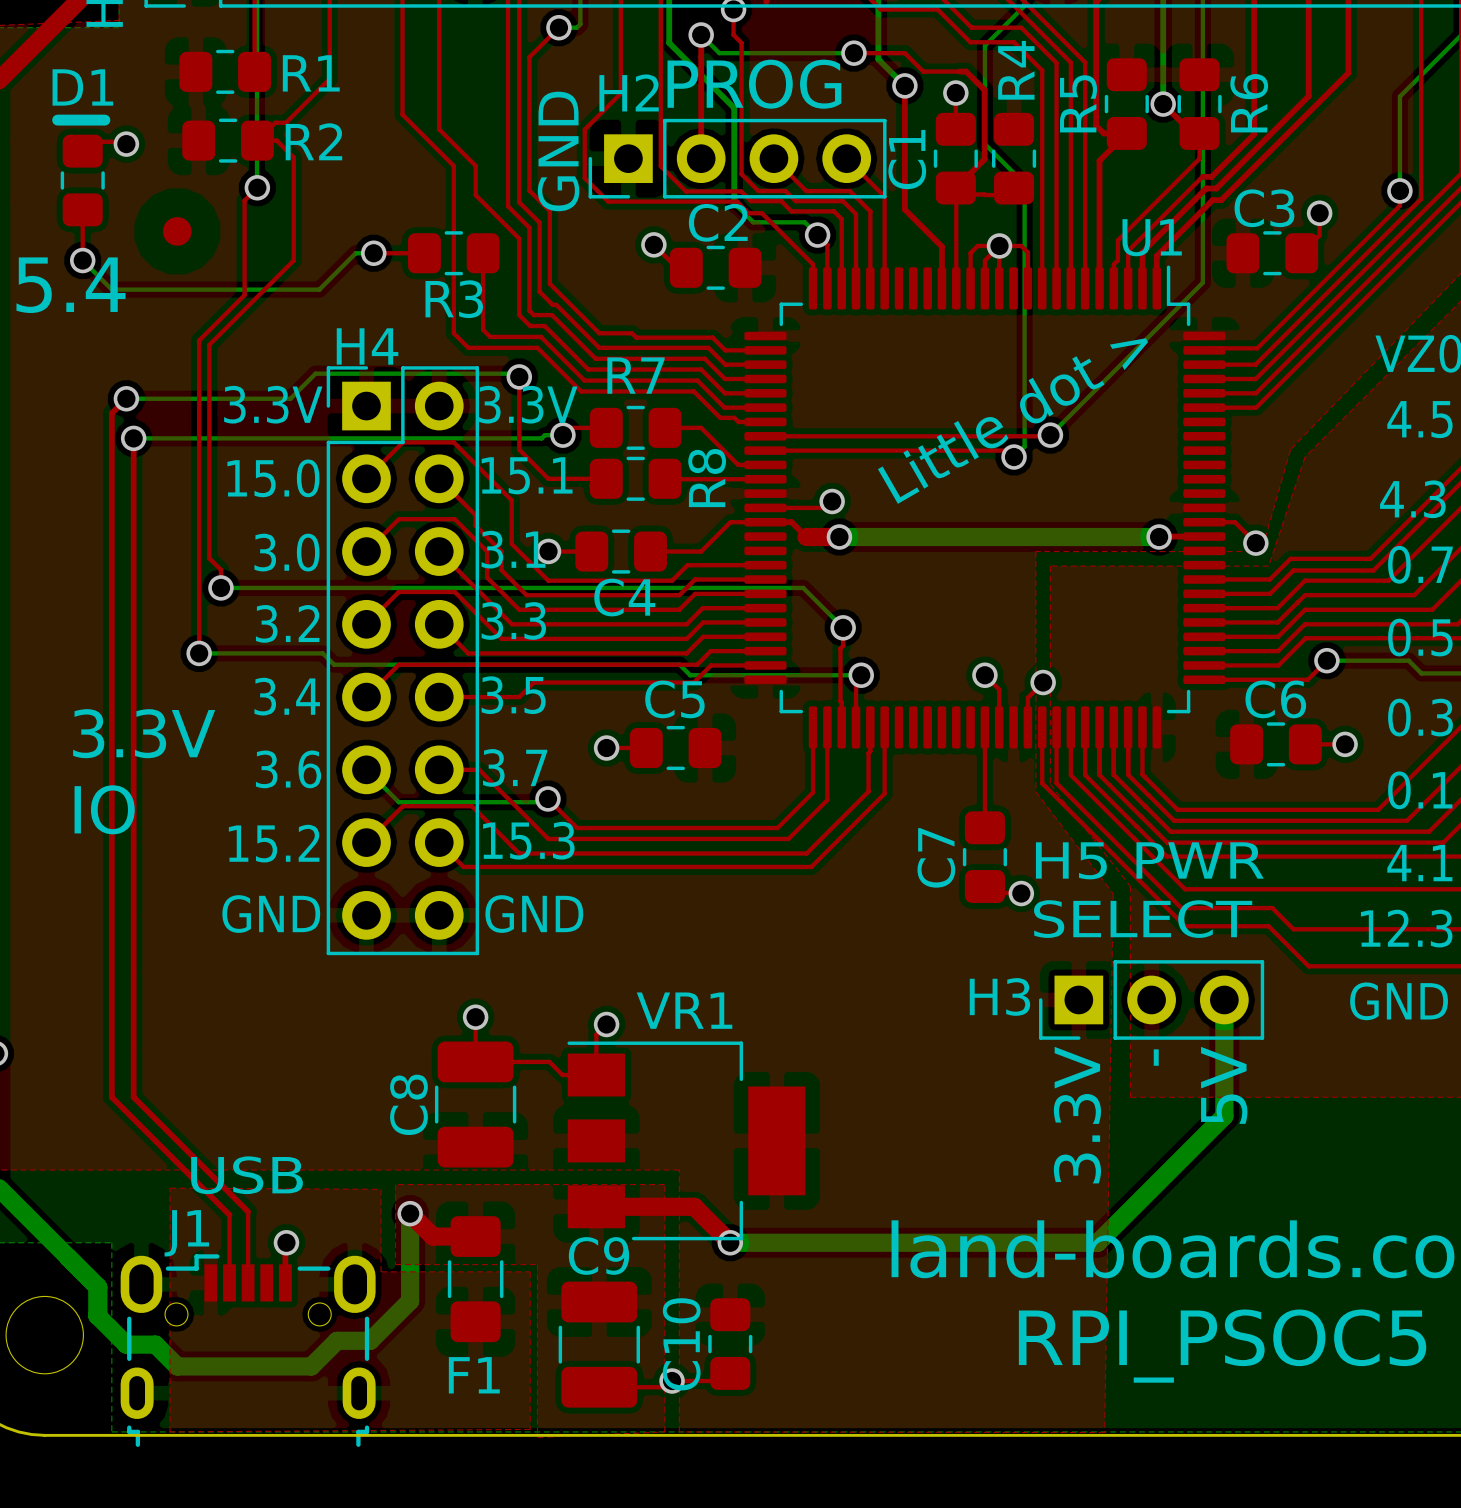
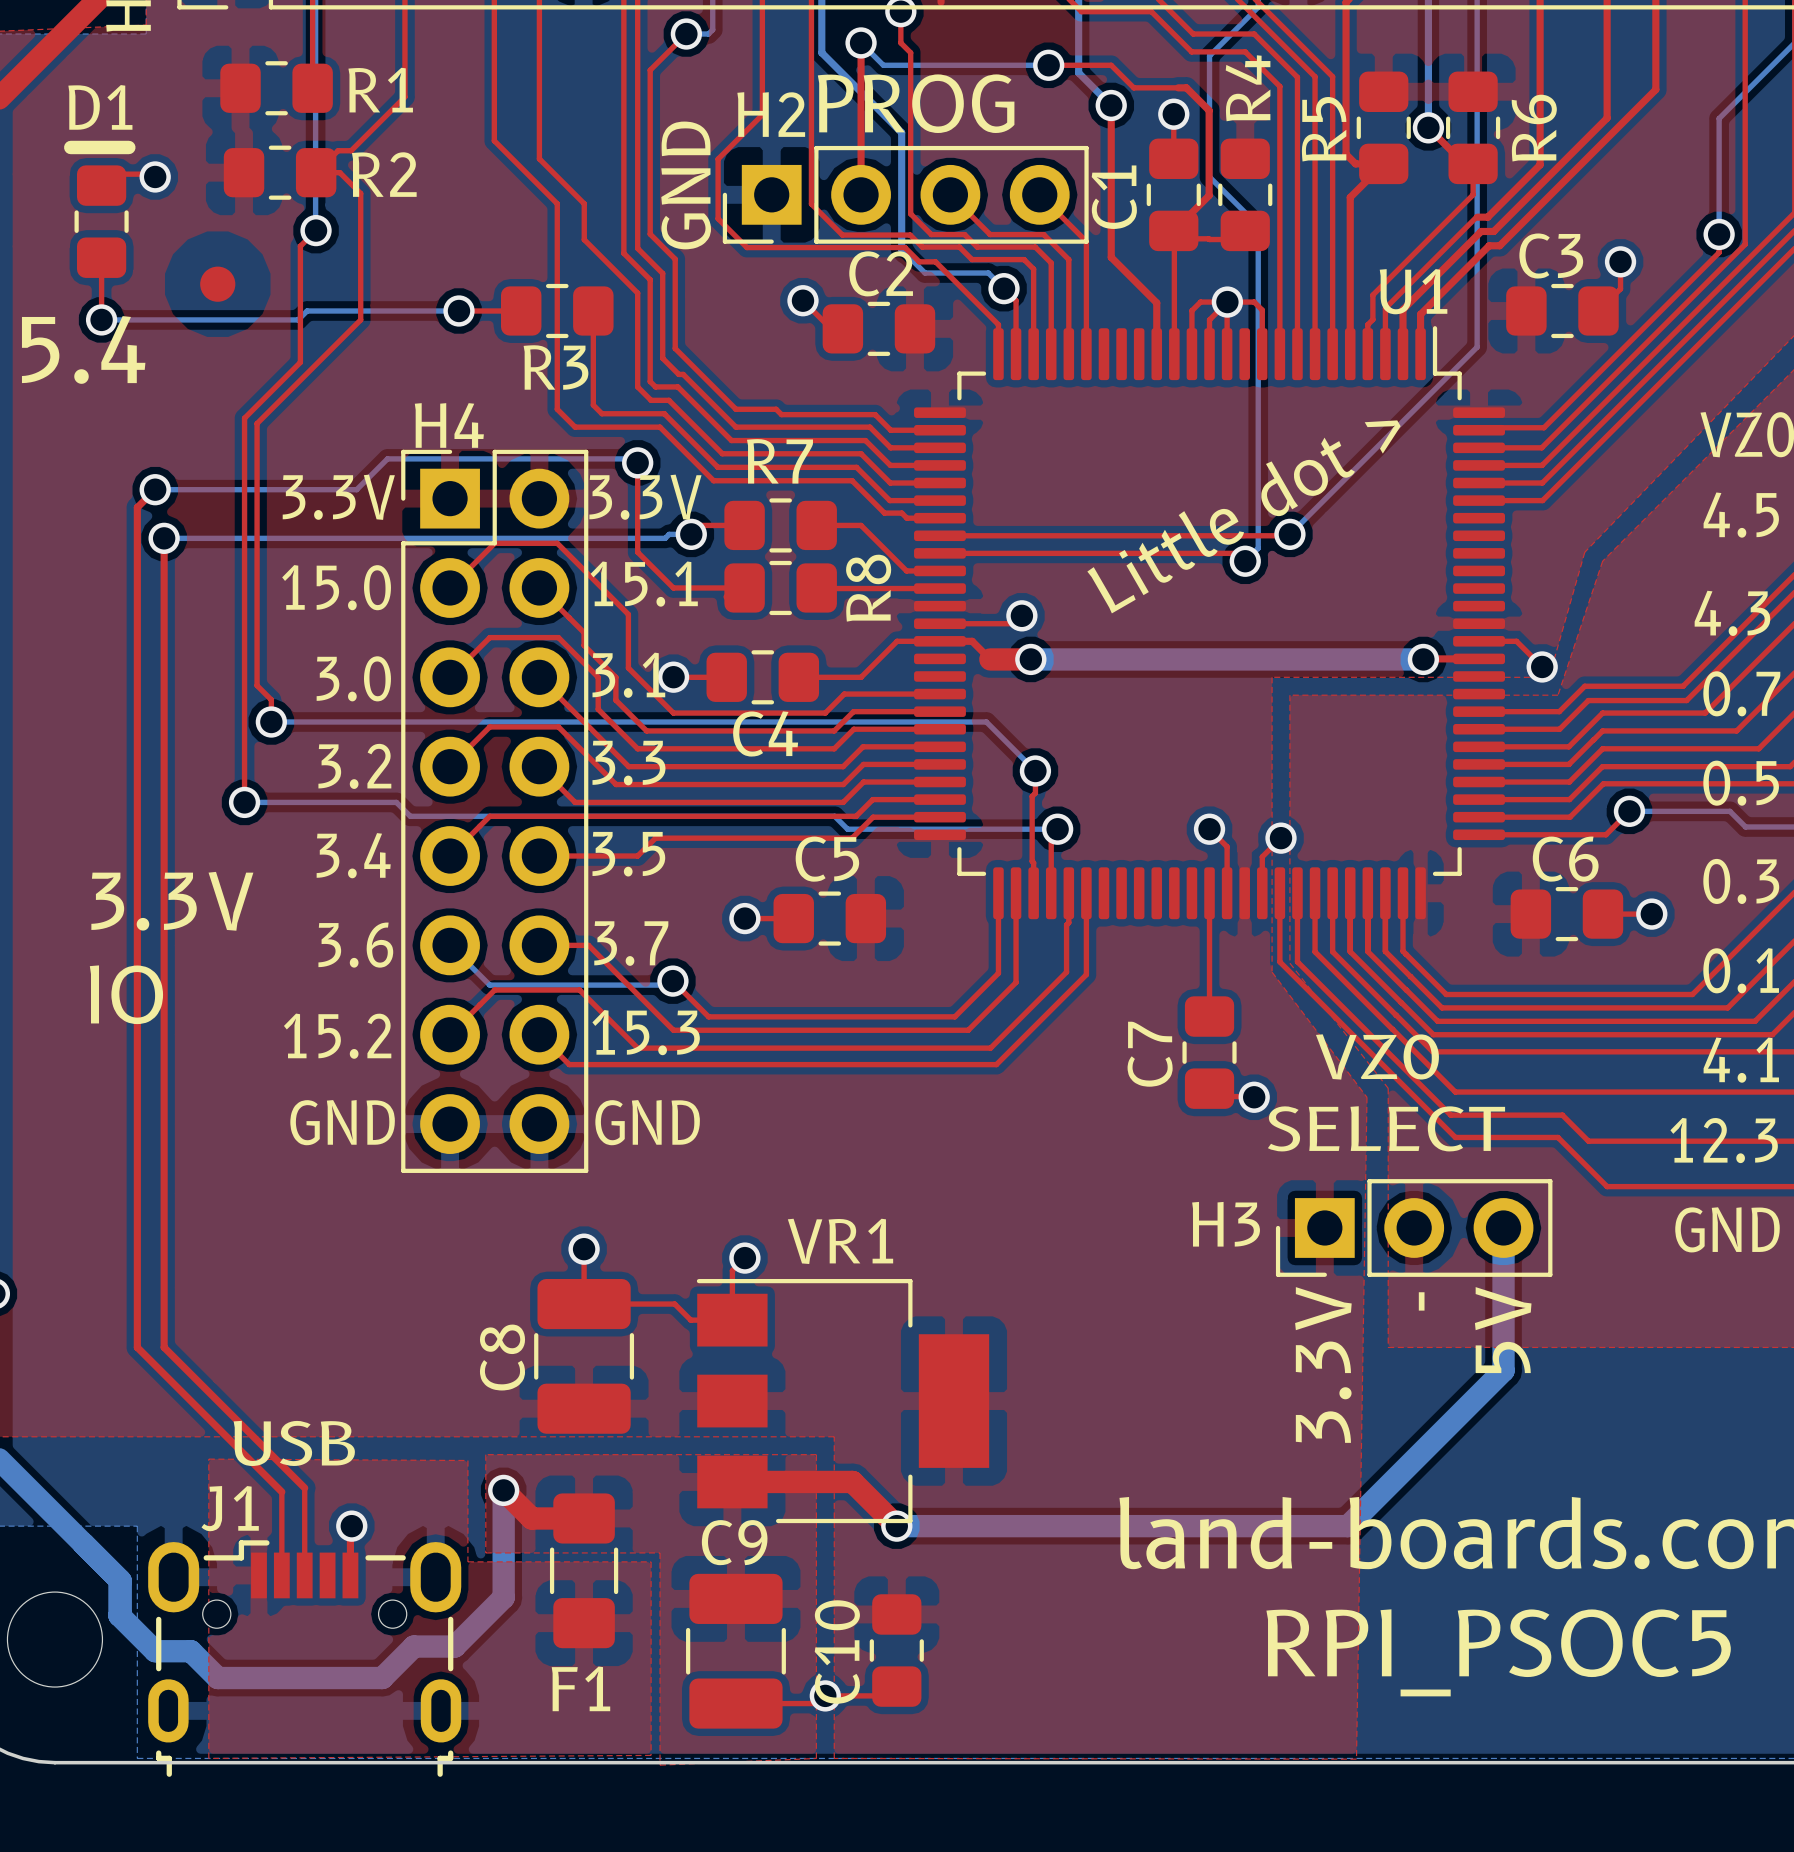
bottom track: (355, 253) (319, 289) (111, 289) (82, 260) -> (436, 310) (307, 310) (298, 319) (101, 319)
text: H5 PWR (1149, 860) -> VZ0 (1377, 1056)

